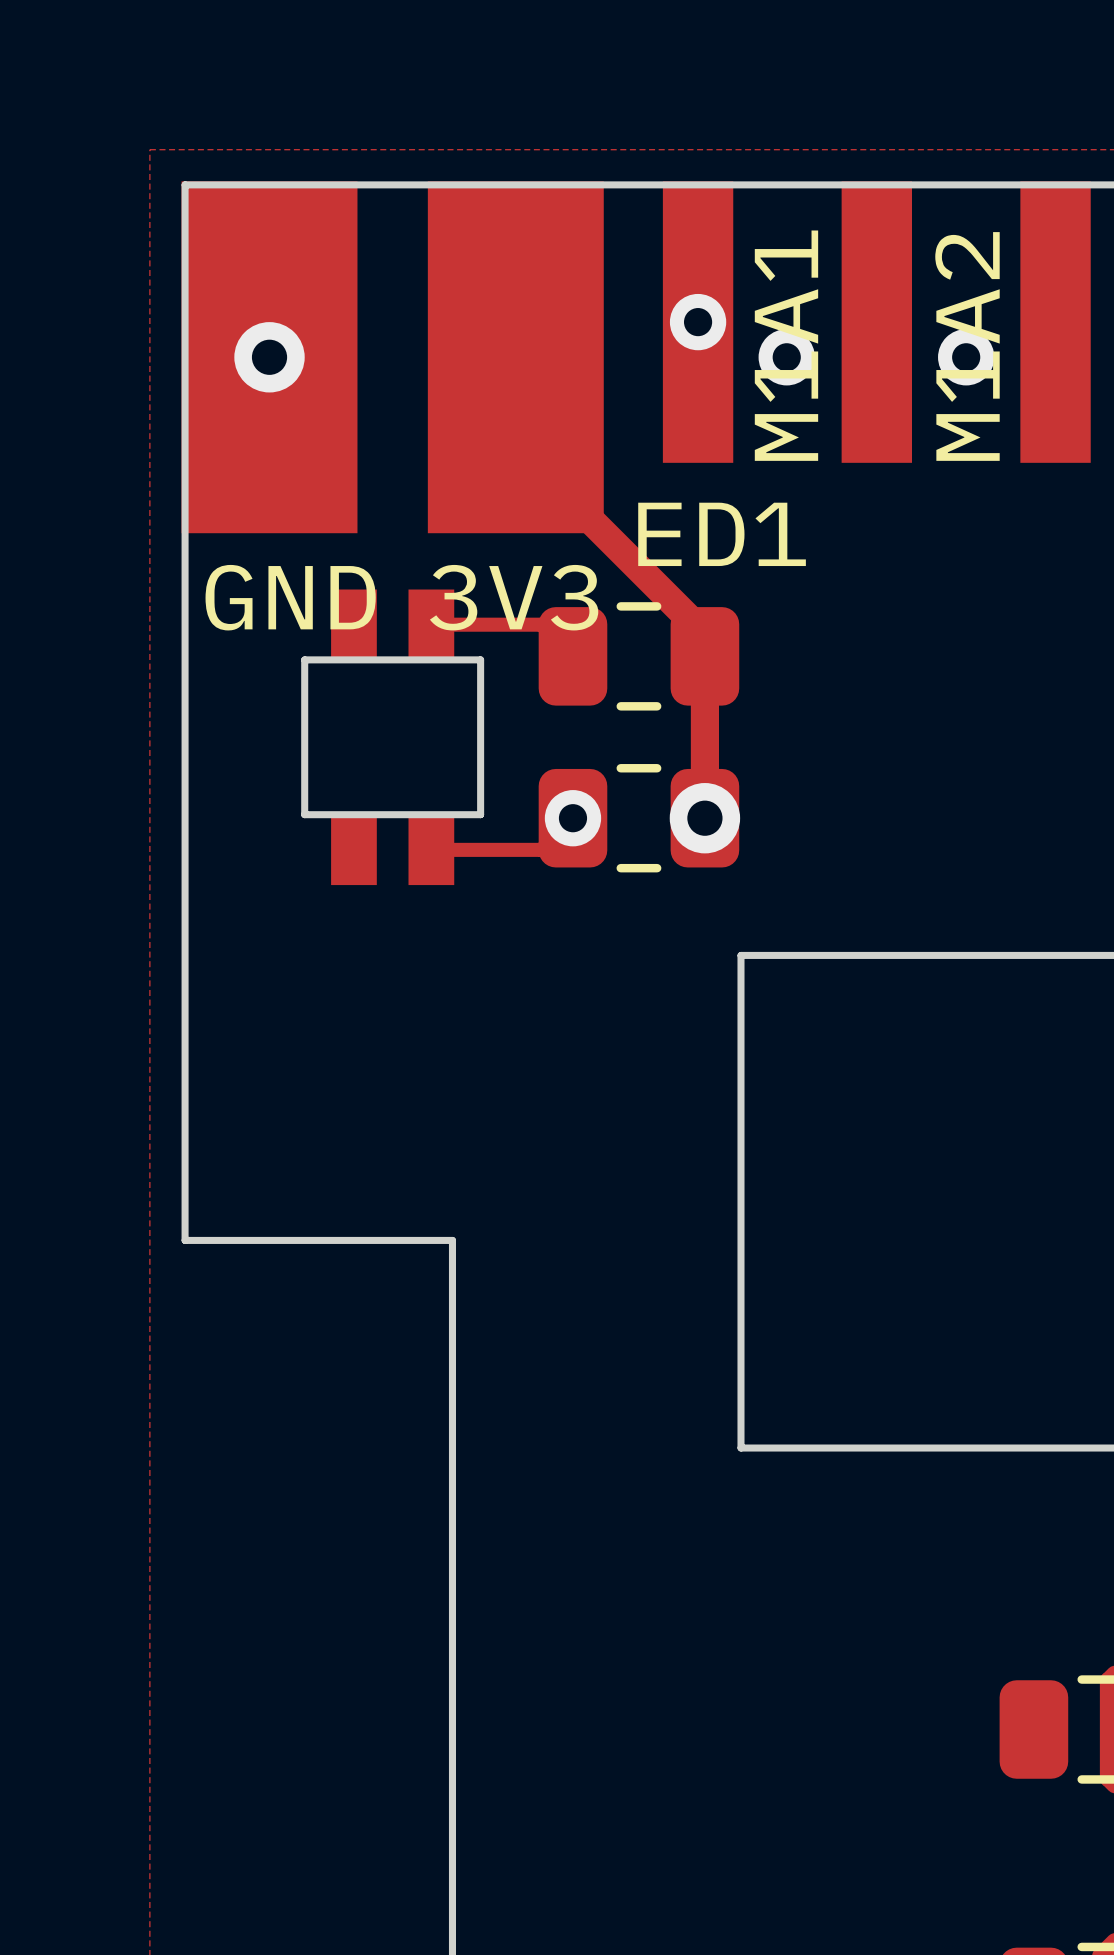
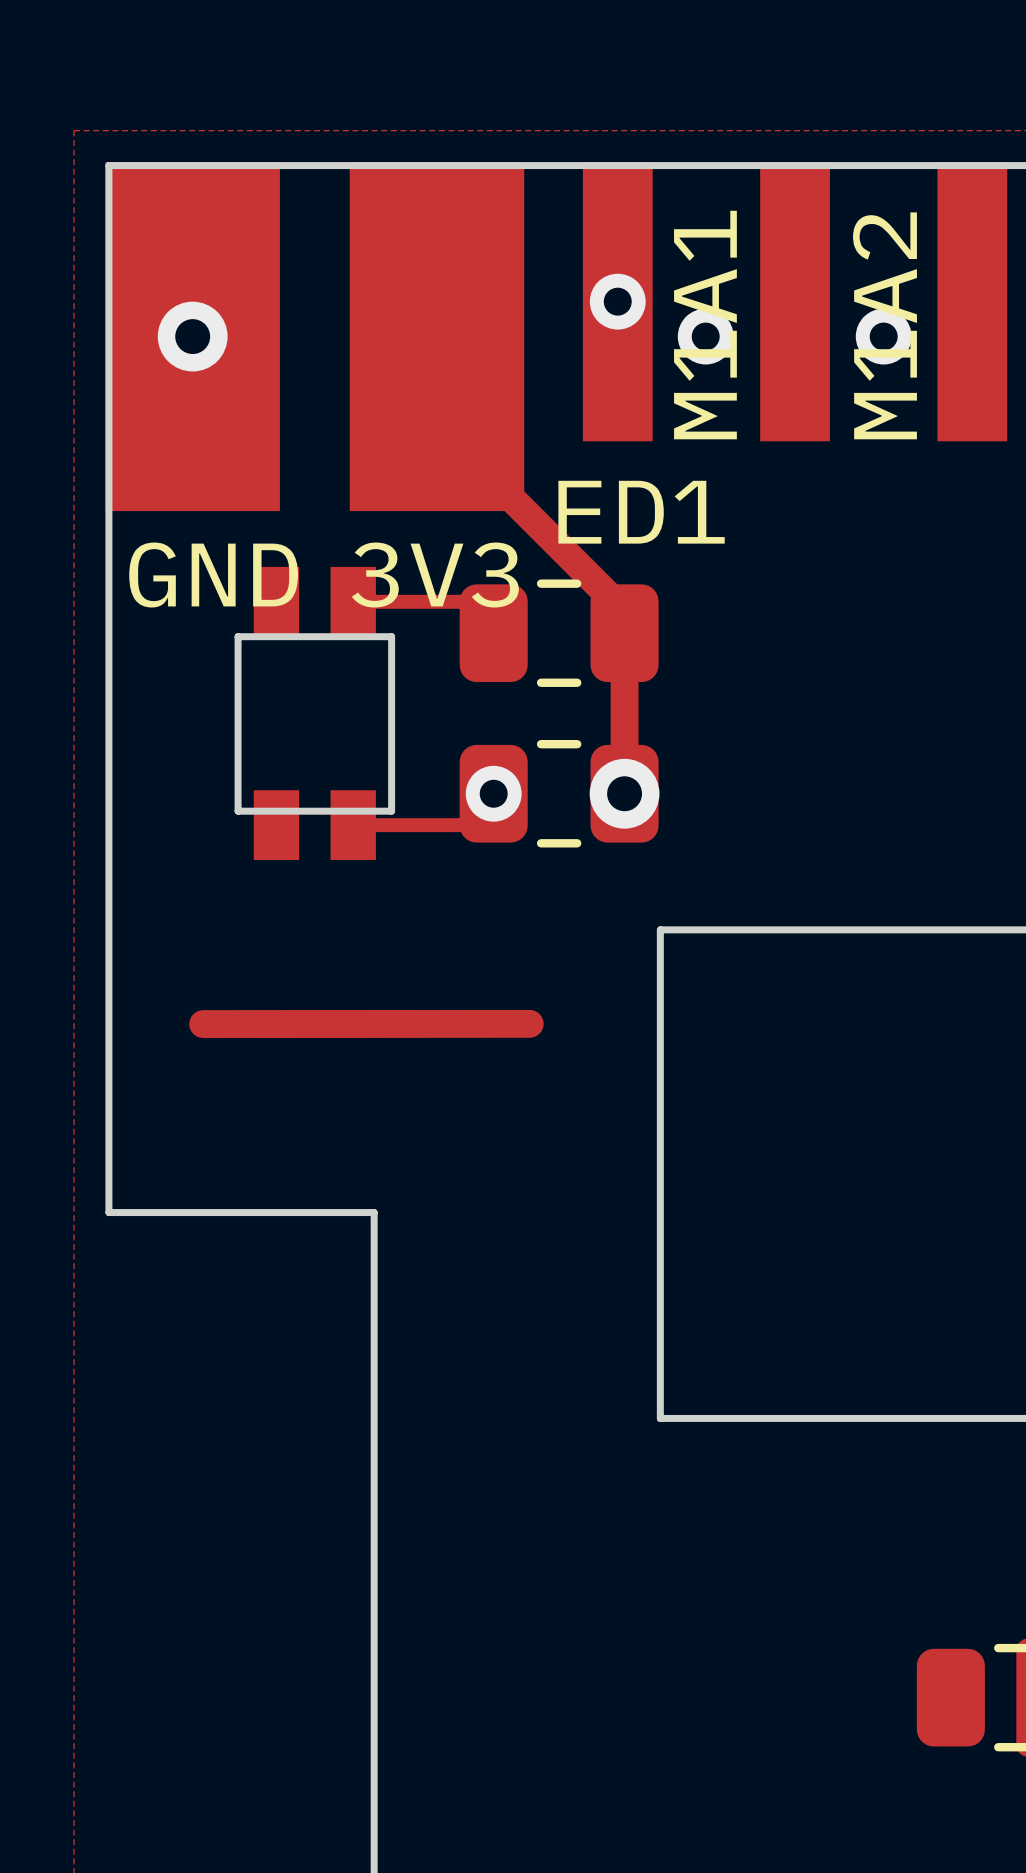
board edge: (315, 659) (304, 659) (304, 814) (480, 814) (480, 659) (470, 659) -> (238, 636) (238, 811) (391, 811) (391, 636)
track: none -> (203, 1024) (529, 1023)

